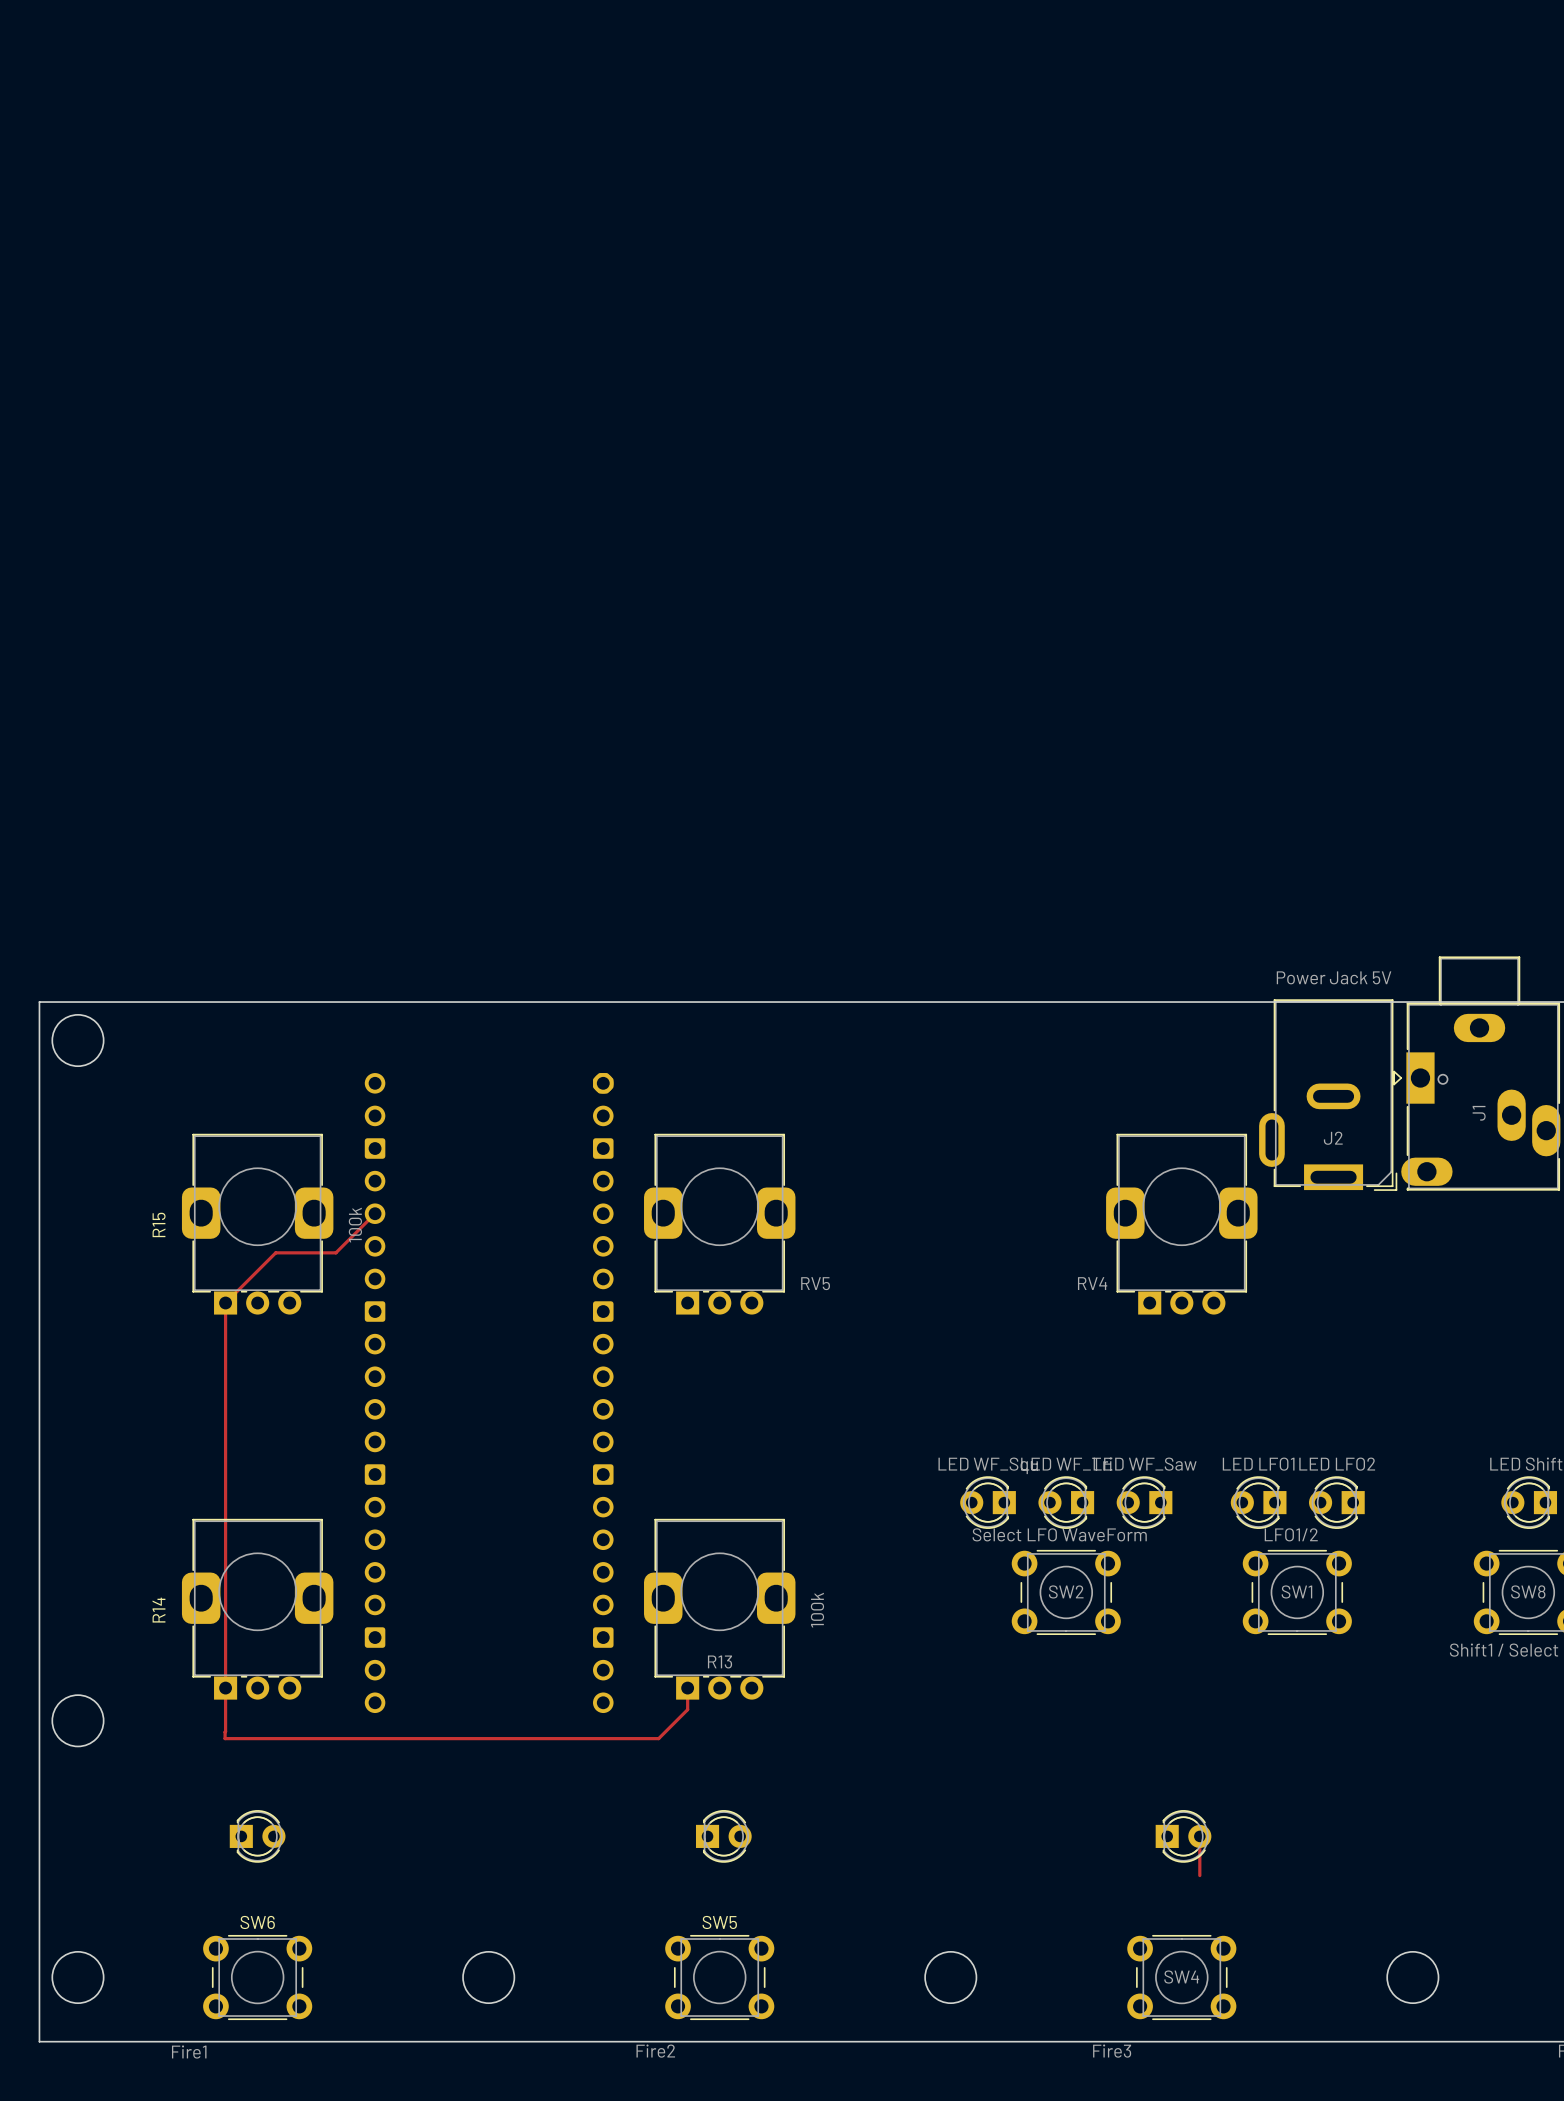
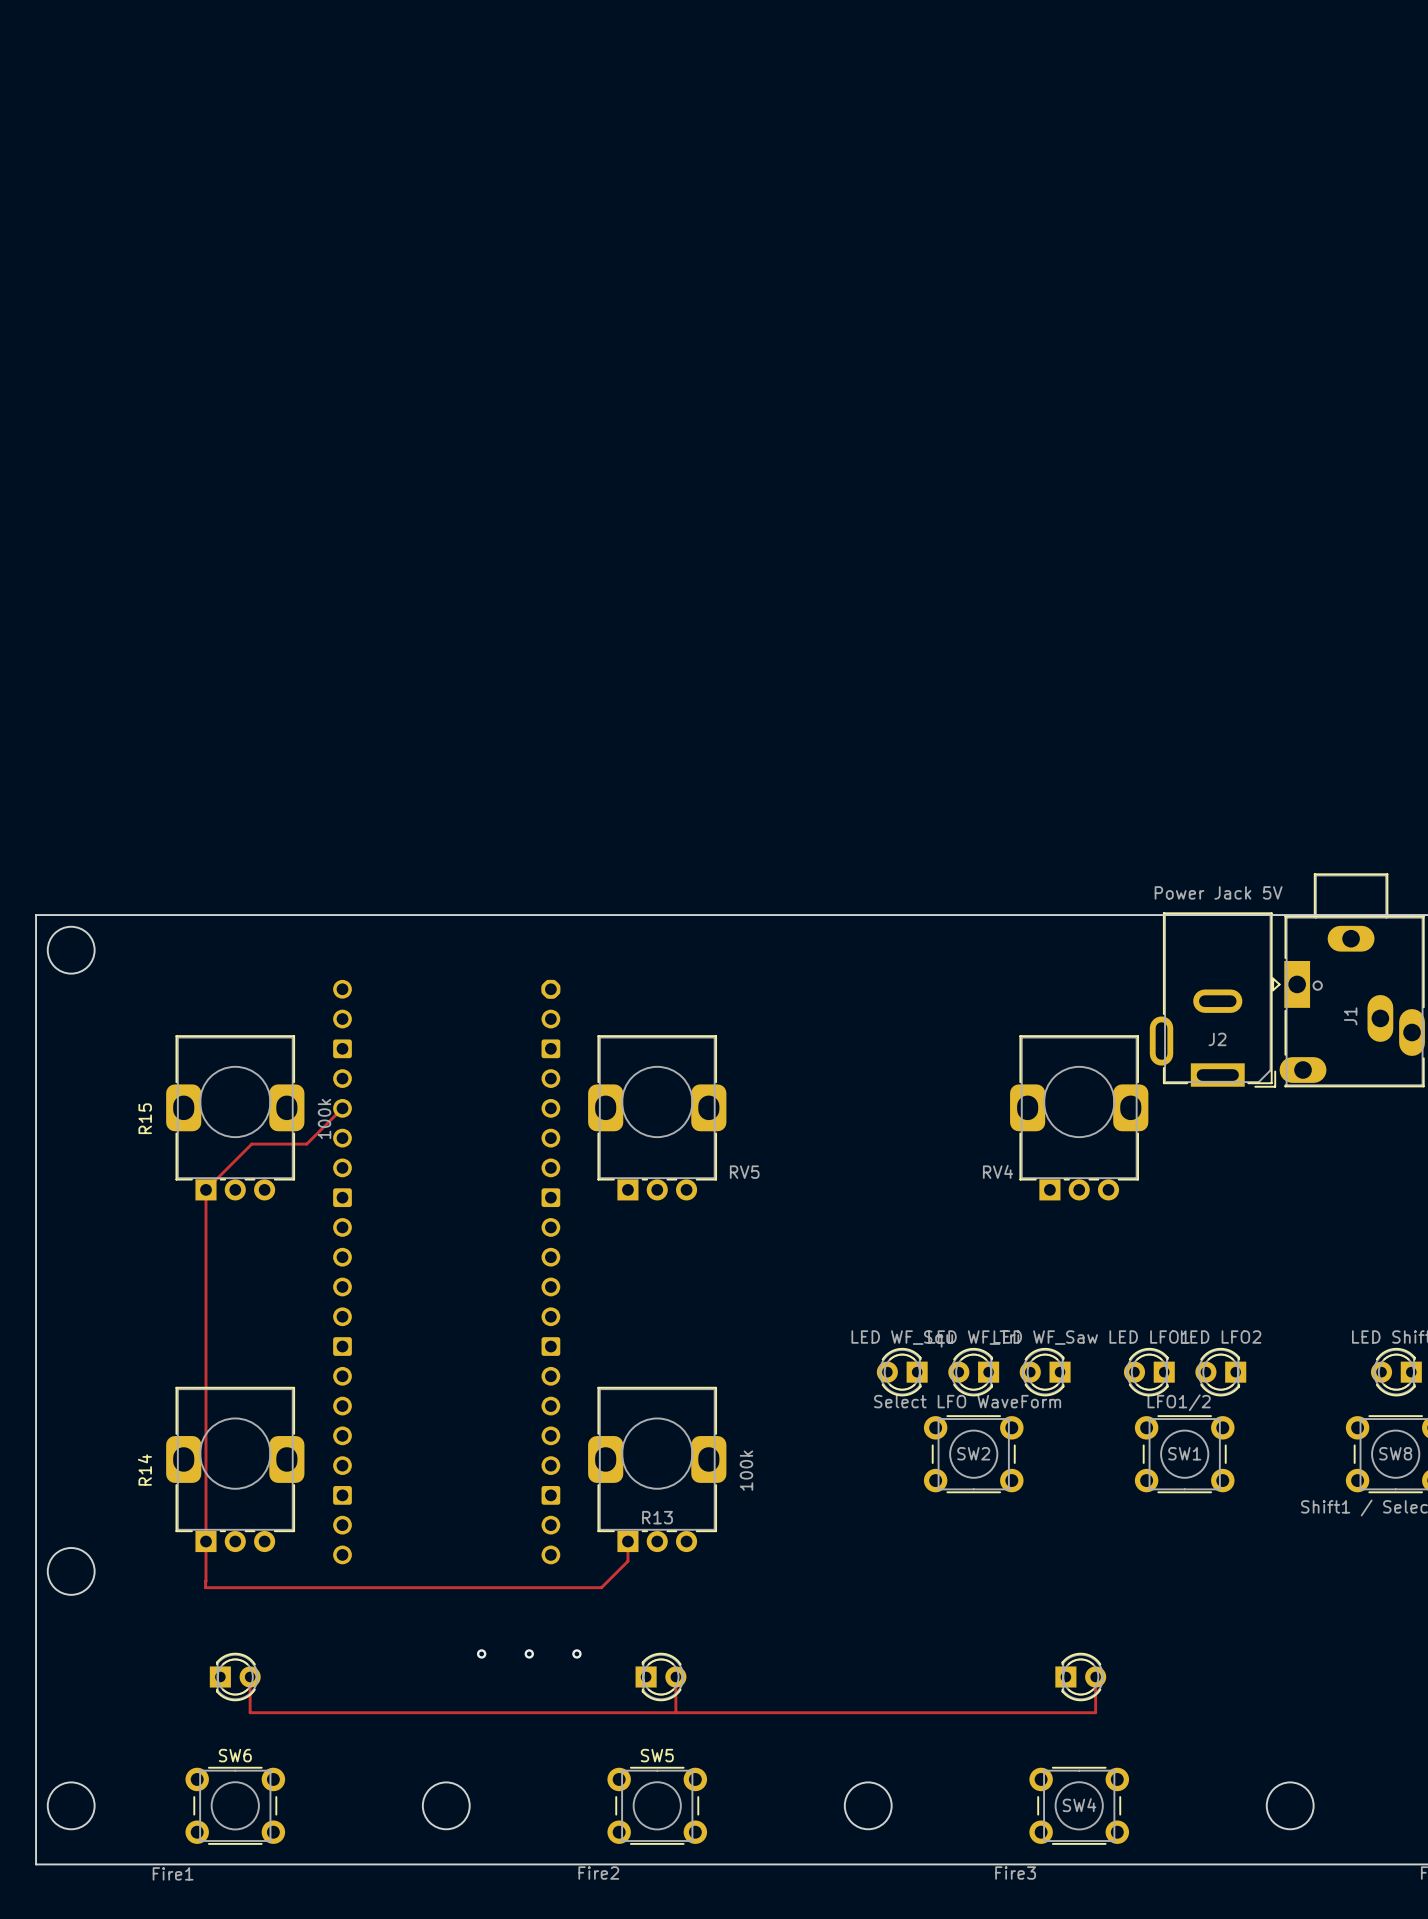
via: none -> (481, 1653)
via: none -> (529, 1653)
via: none -> (576, 1653)
track: none -> (250, 1676) (250, 1712) (1095, 1712)
track: none -> (675, 1676) (675, 1712)

